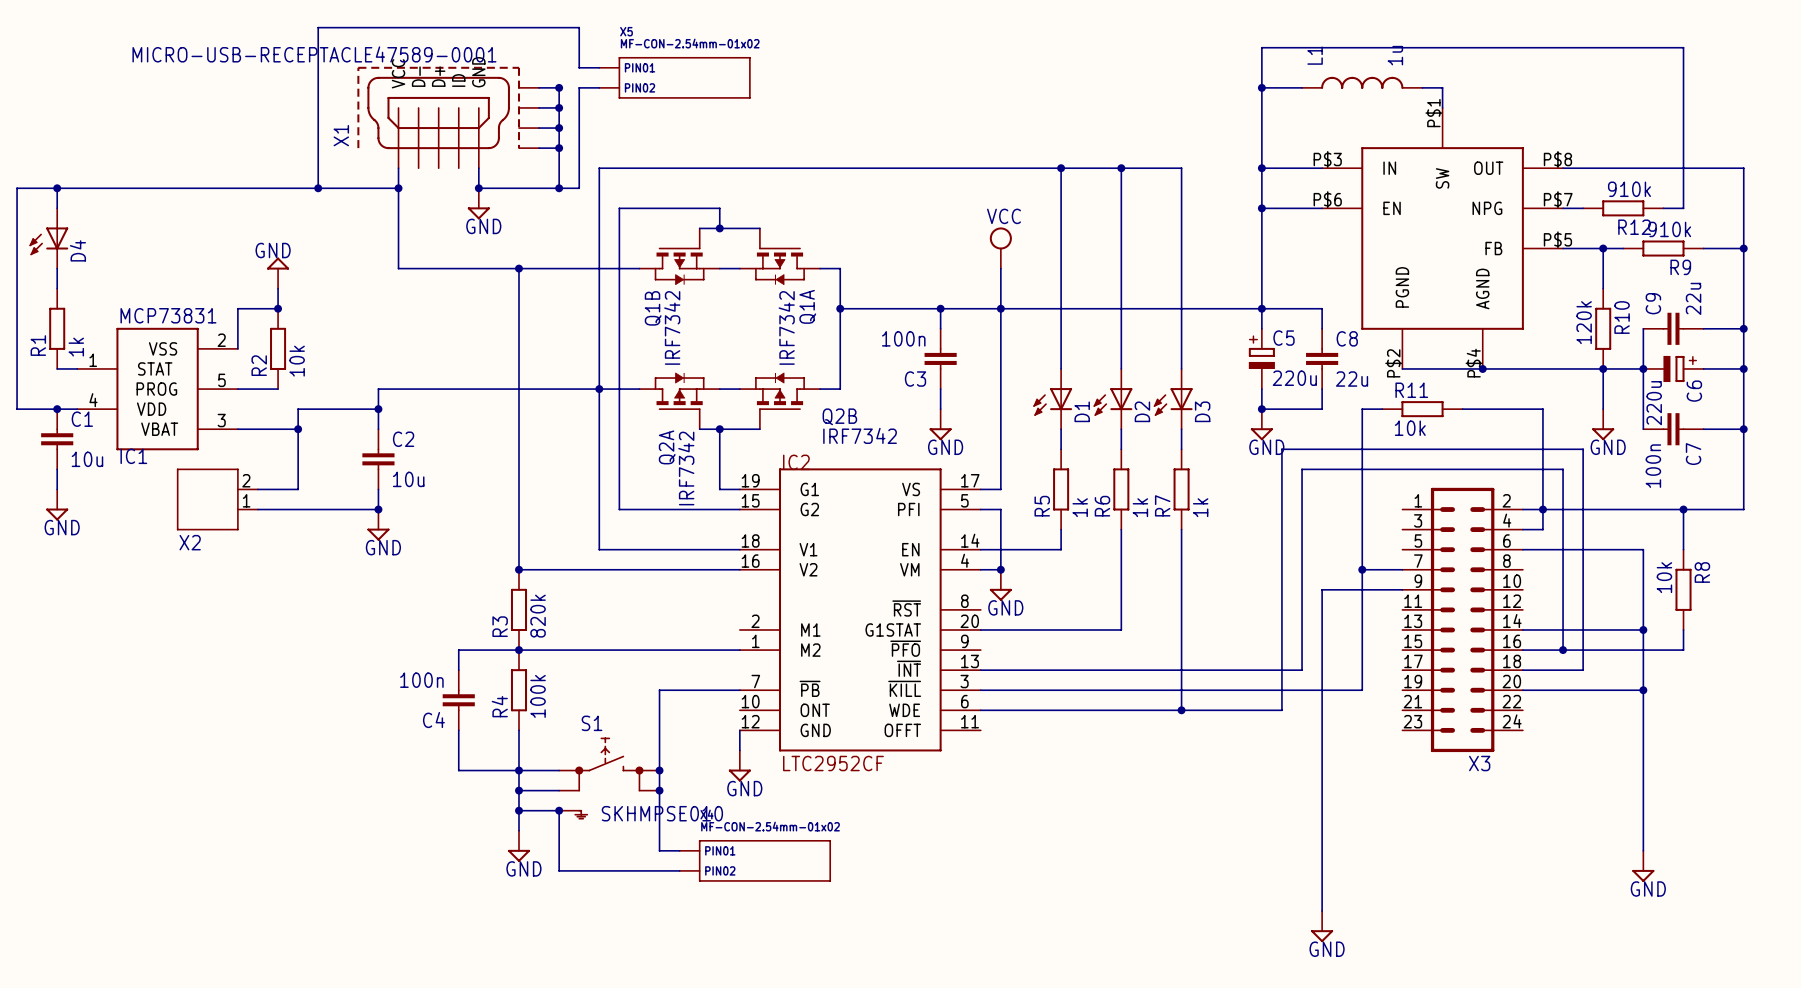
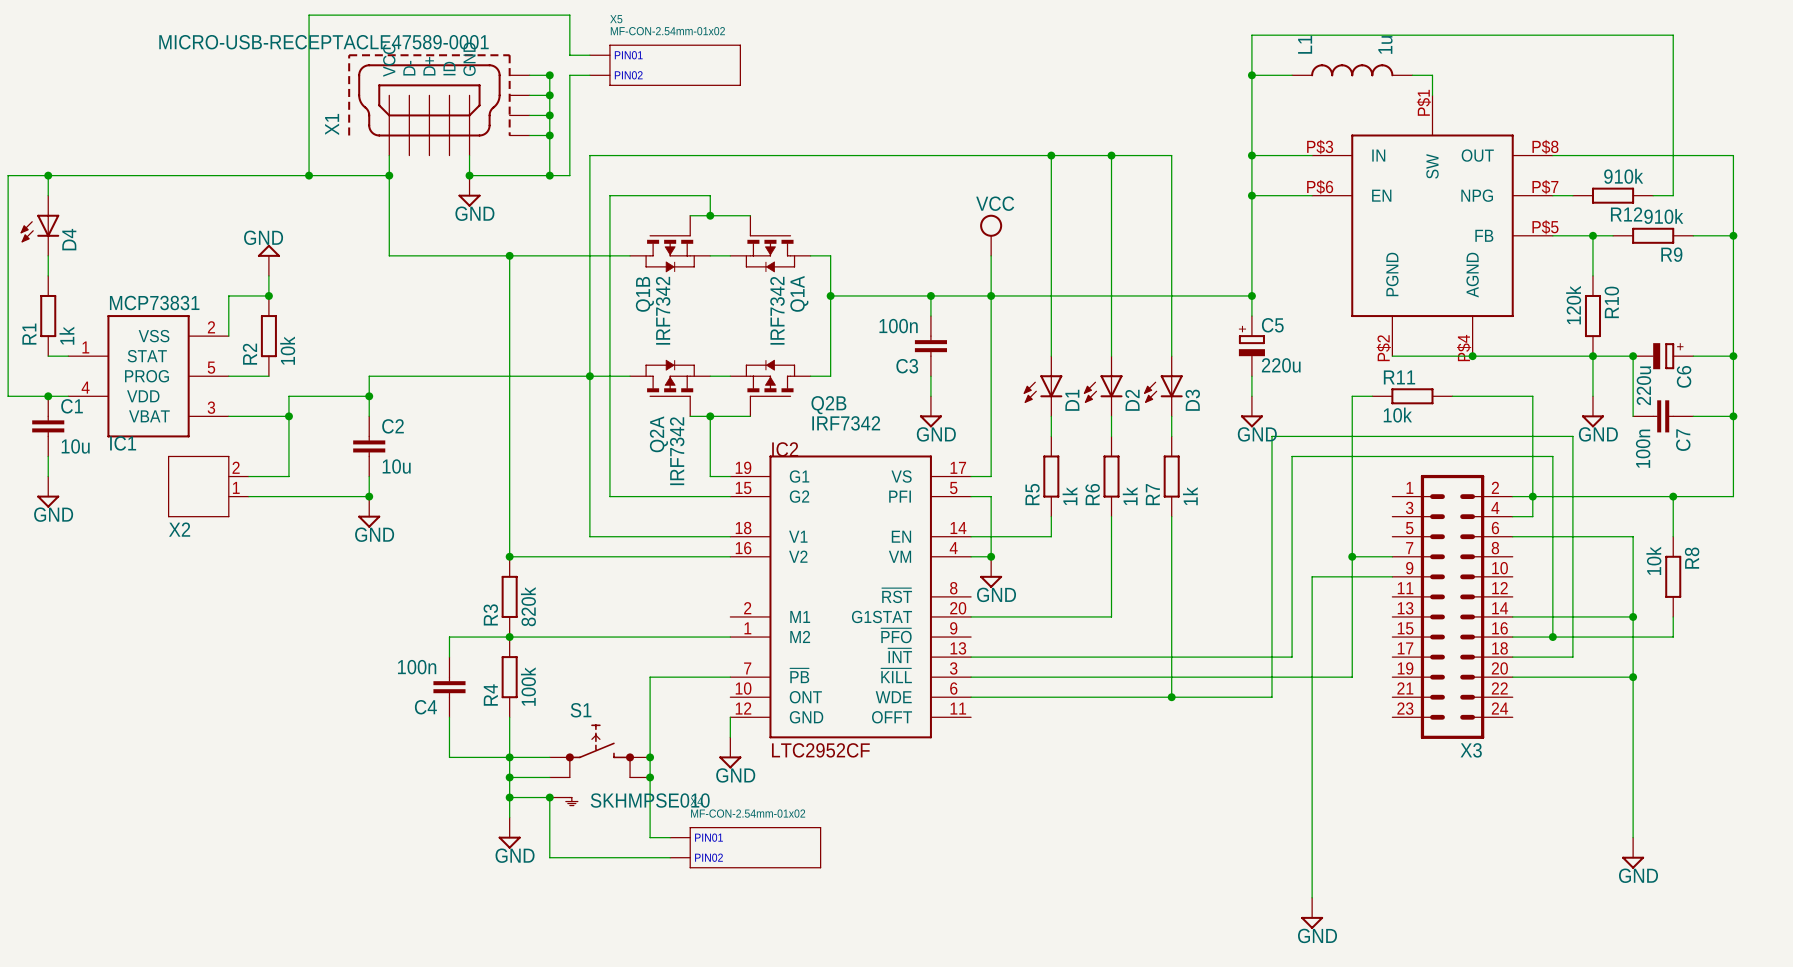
wire: (1261, 308) (1322, 308) (1322, 328) -> none
wire: (1643, 328) (1643, 368) -> none
C9: 22u (1673, 328) -> none
wire: (1703, 328) (1743, 328) -> none
junction: (1743, 328) -> none
C8: 22u (1322, 358) -> none
wire: (1322, 389) (1322, 409) (1261, 409) -> none
junction: (1261, 409) -> none

